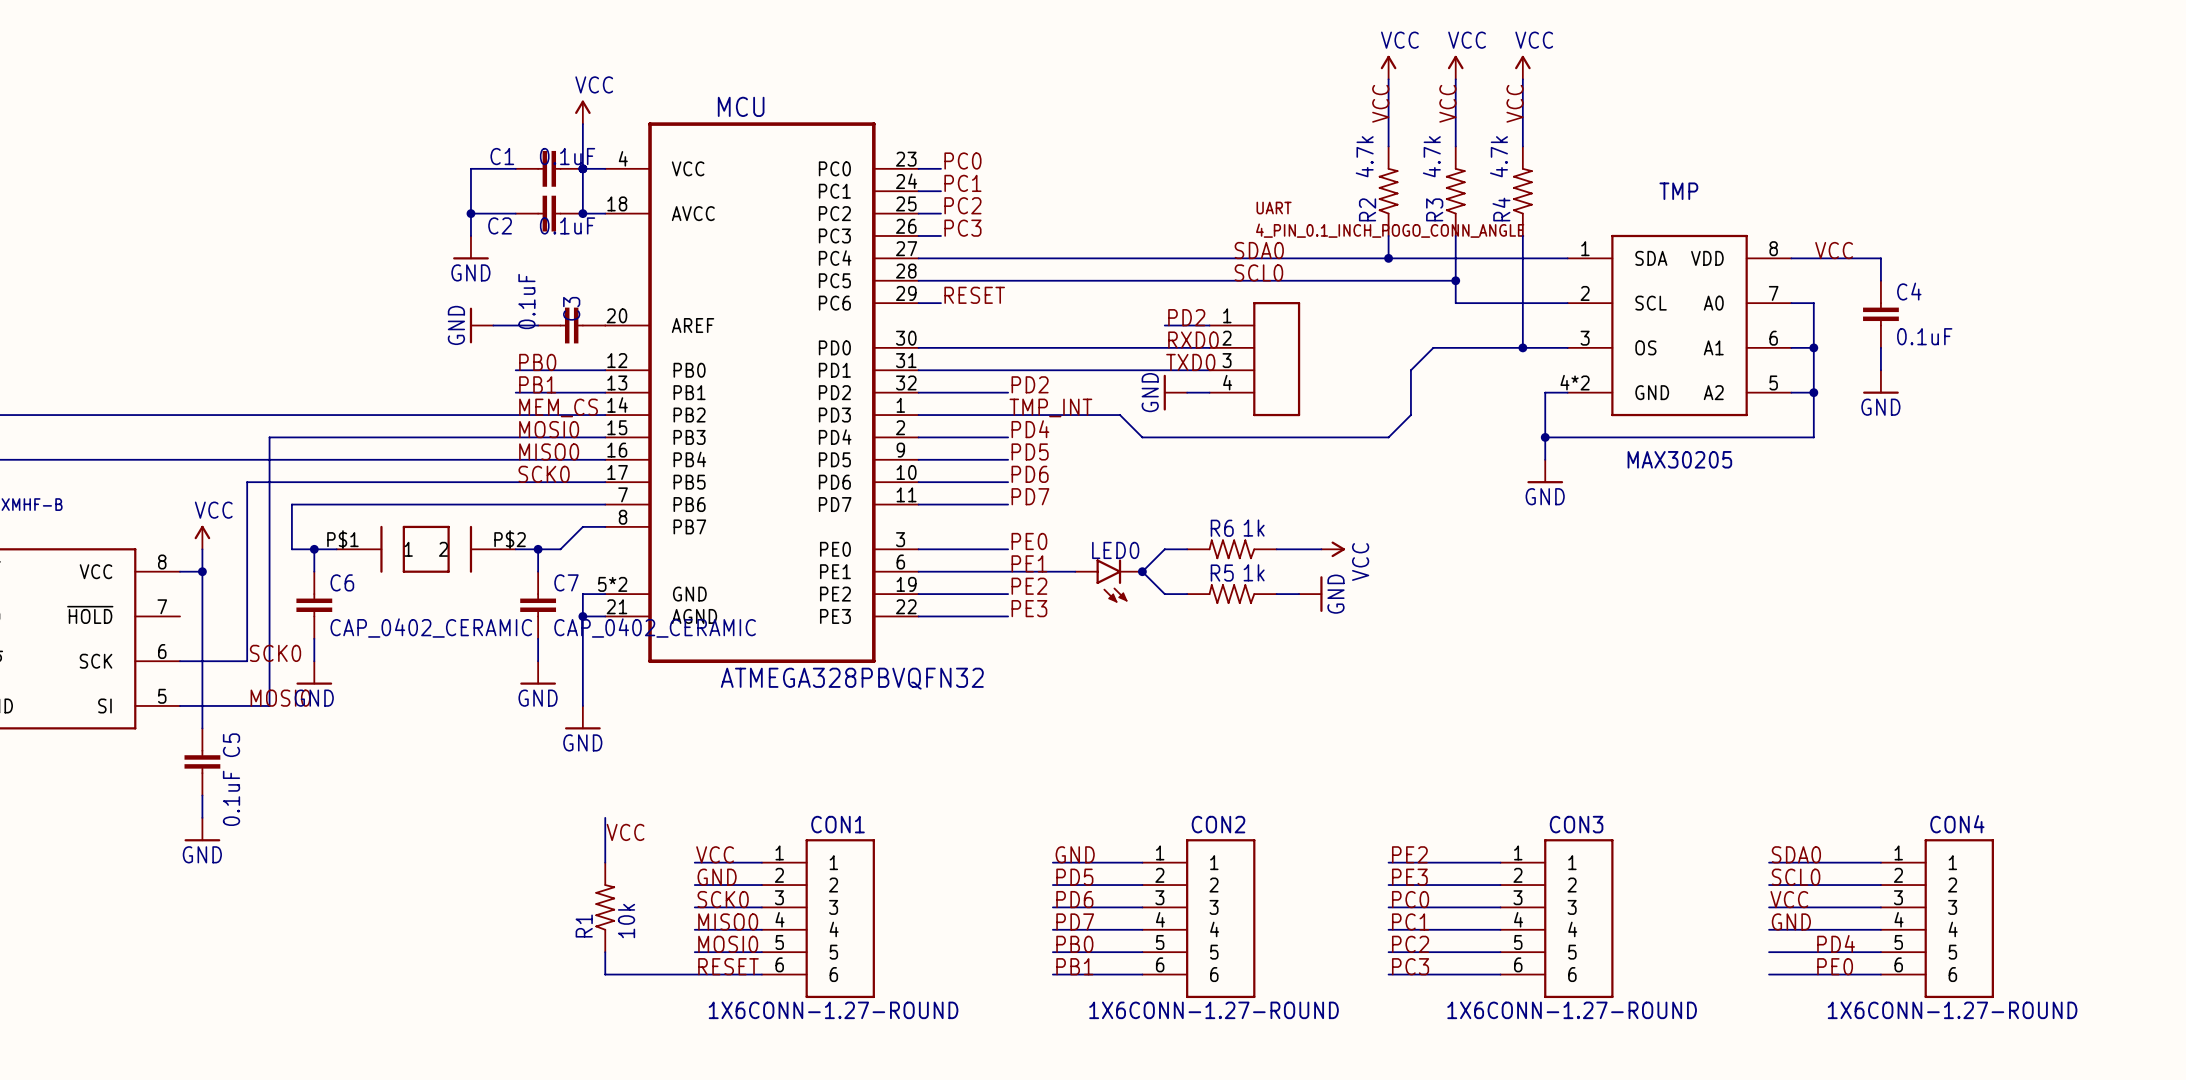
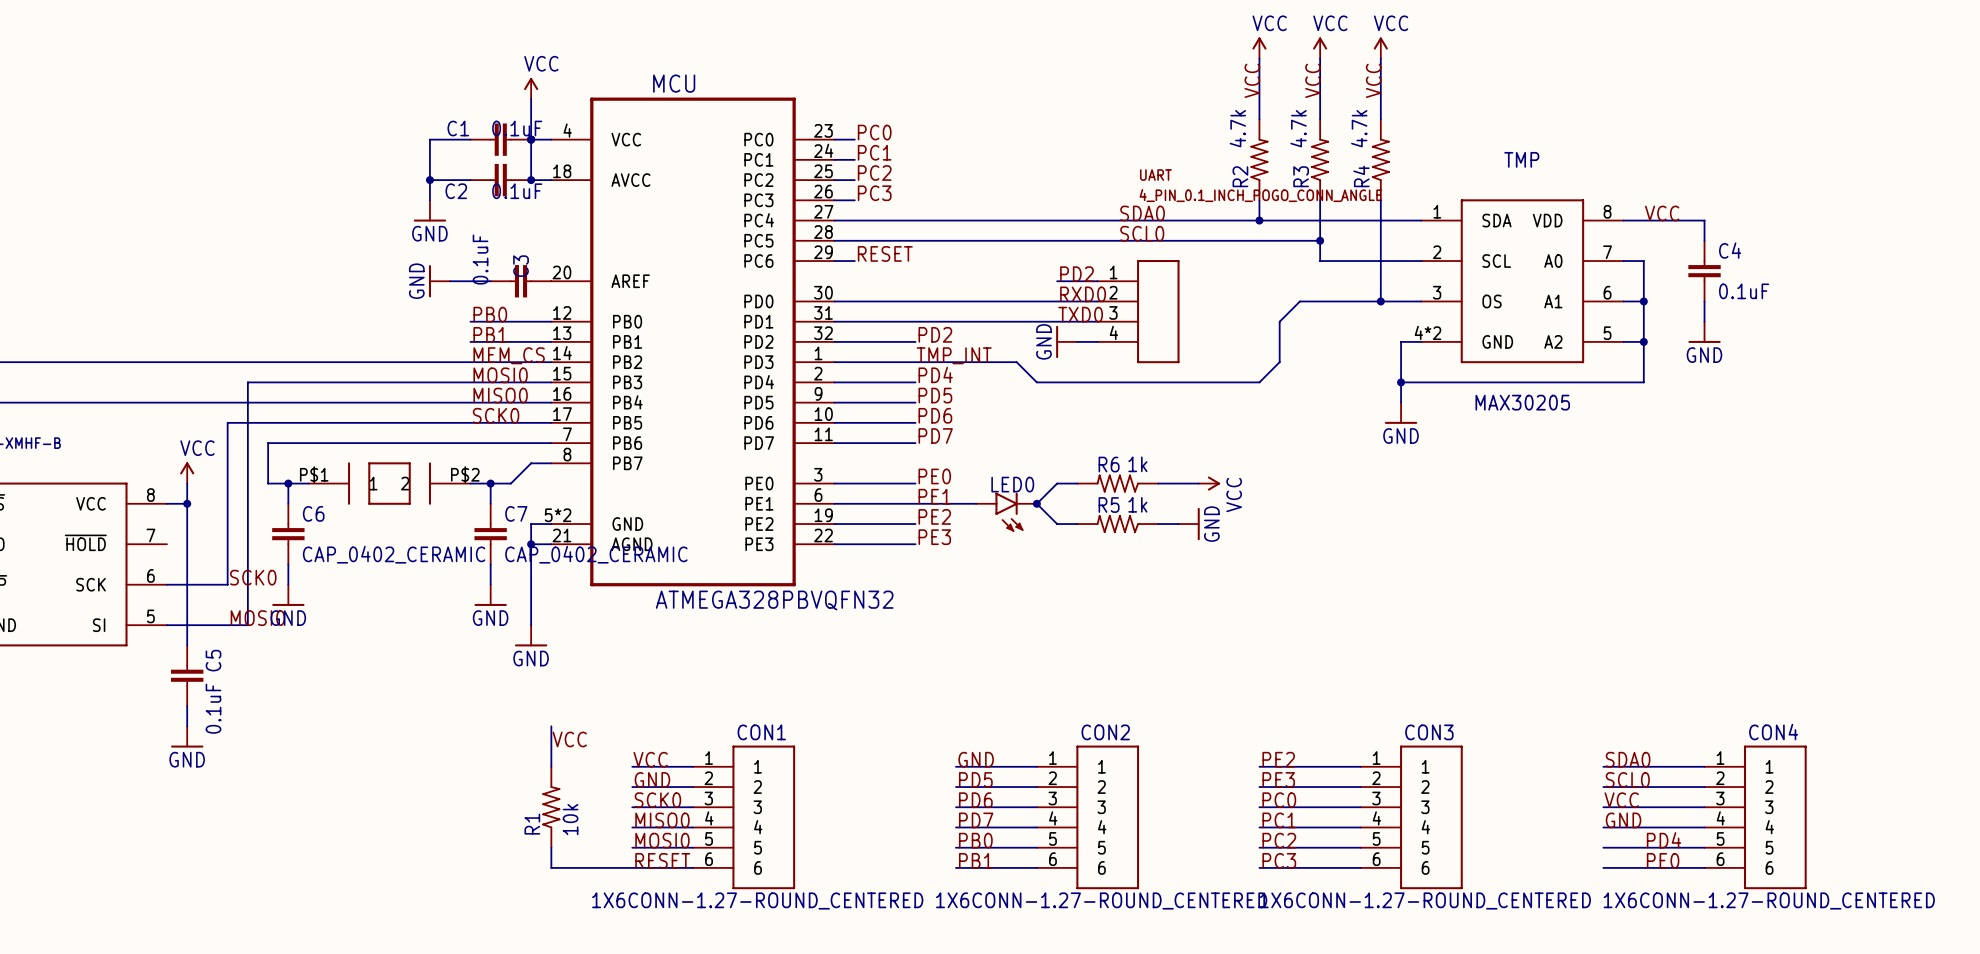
CON1 value: 1X6CONN-1.27-ROUND (833, 1010) -> 1X6CONN-1.27-ROUND_CENTERED (757, 900)
CON2 value: 1X6CONN-1.27-ROUND (1214, 1010) -> 1X6CONN-1.27-ROUND_CENTERED (1101, 900)
CON3 value: 1X6CONN-1.27-ROUND (1572, 1010) -> 1X6CONN-1.27-ROUND_CENTERED (1425, 900)
CON4 value: 1X6CONN-1.27-ROUND (1952, 1010) -> 1X6CONN-1.27-ROUND_CENTERED (1769, 900)

